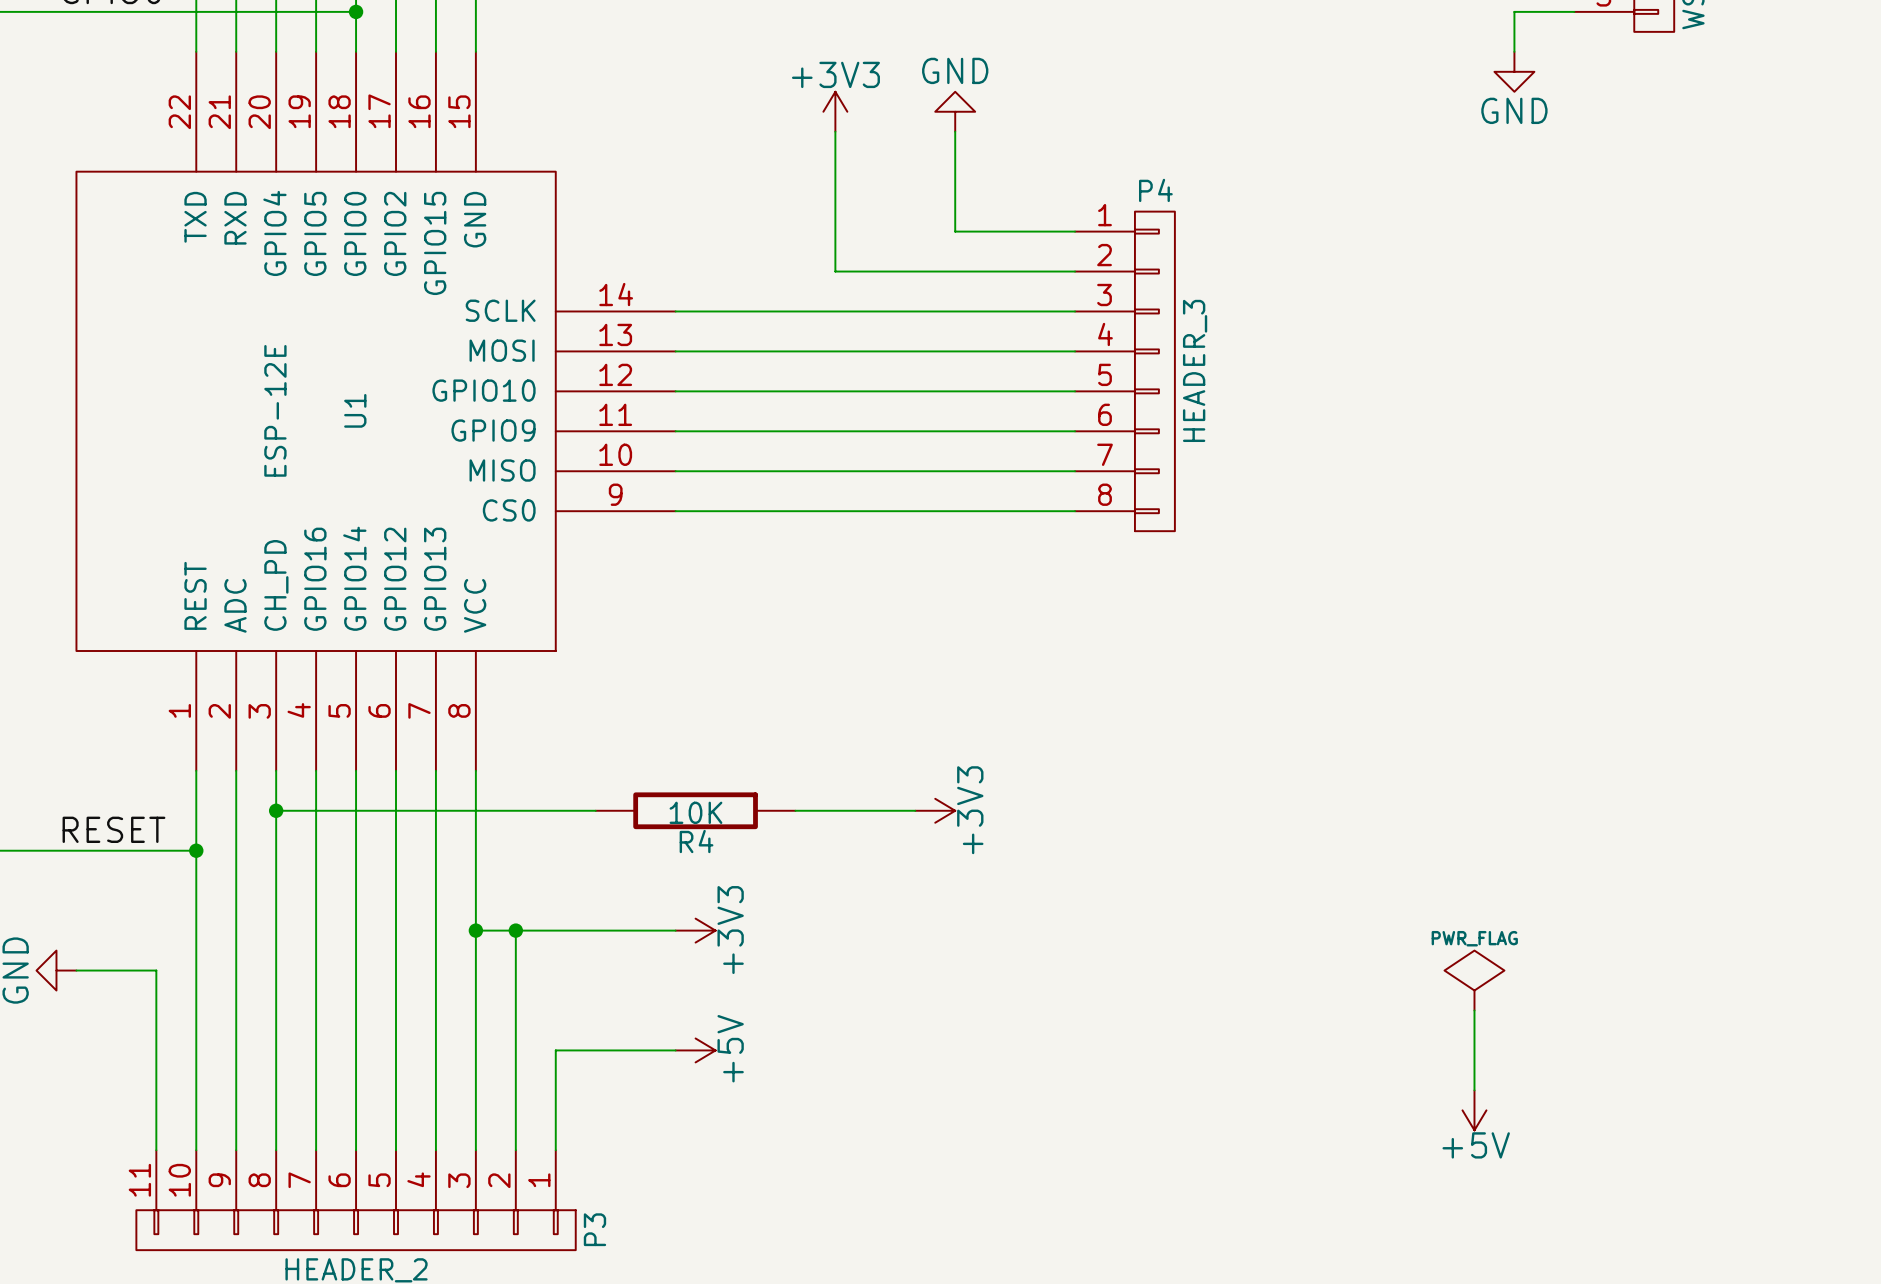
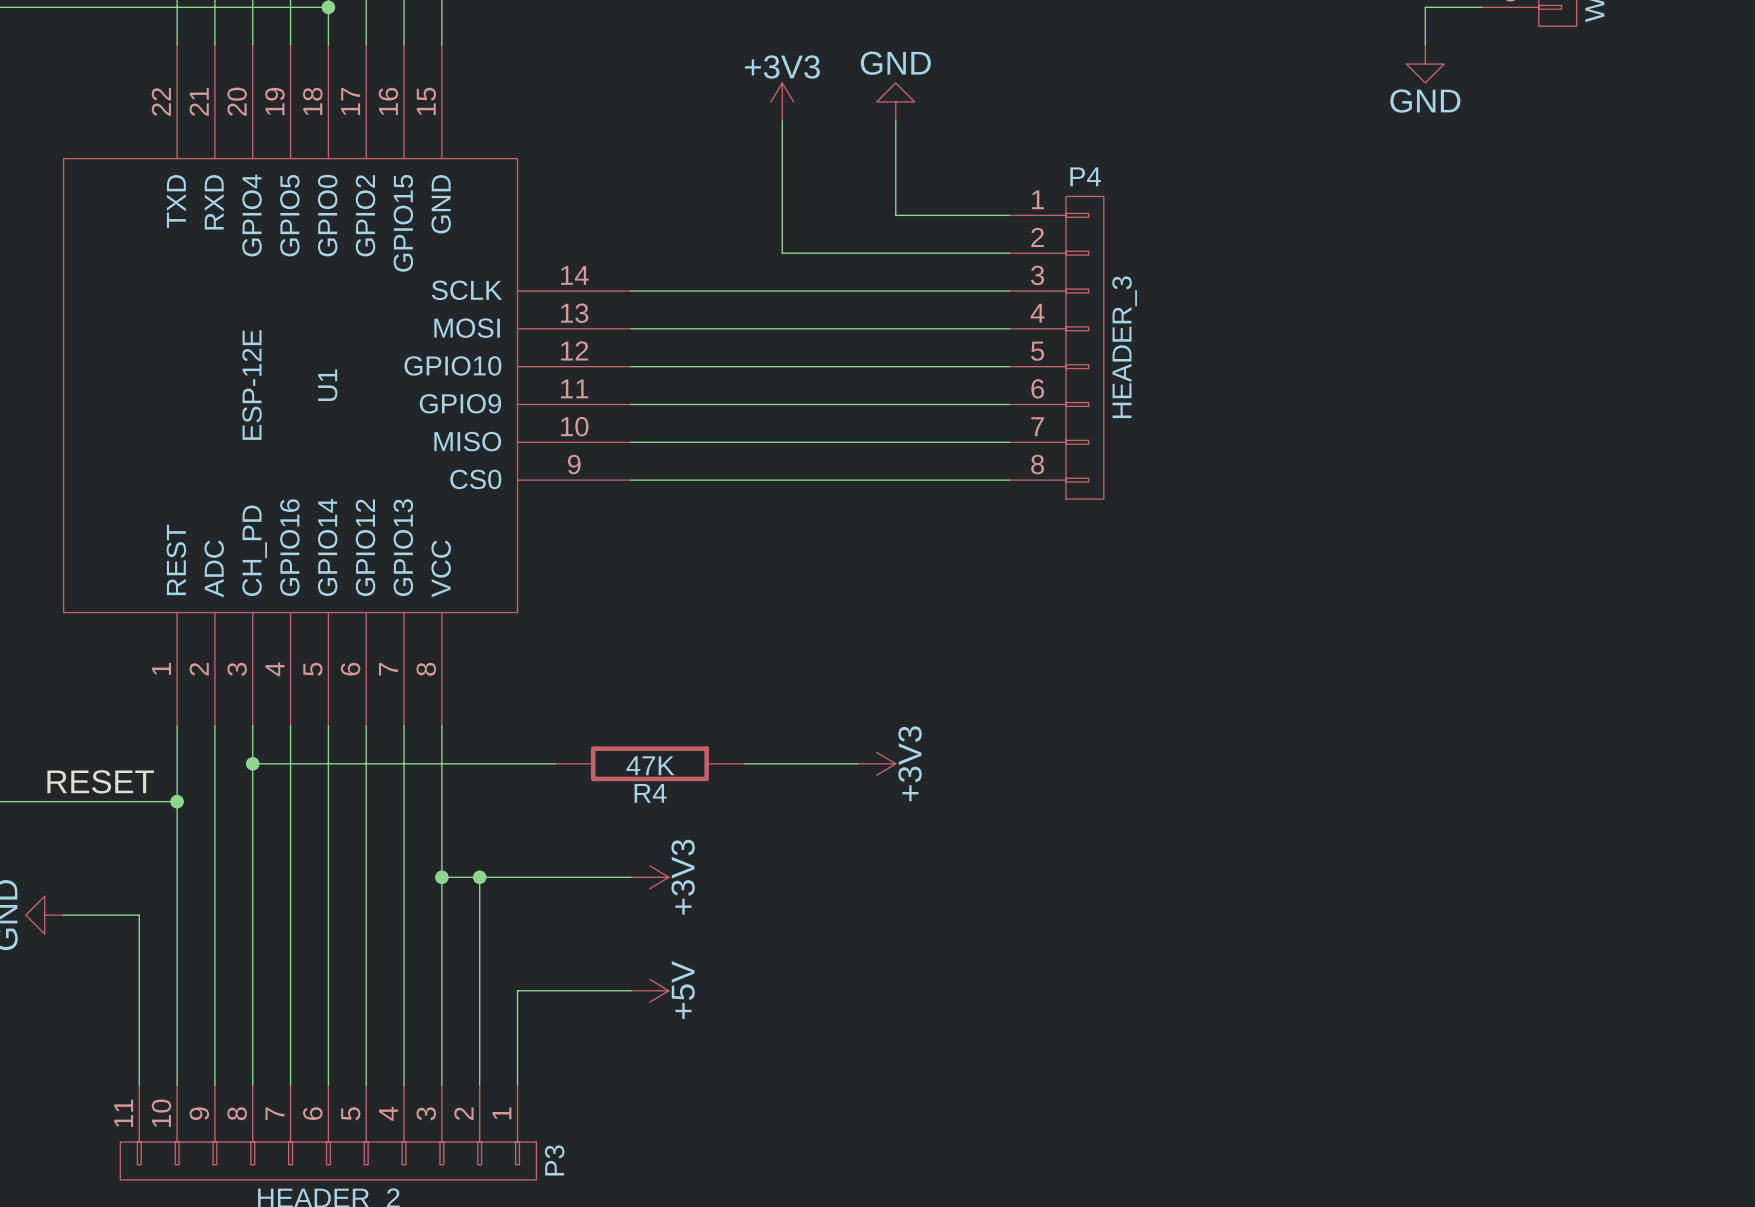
R4 value: 10K (695, 812) -> 47K (650, 765)
power symbol: PWR_FLAG (1474, 980) -> none
wire: (1474, 1010) (1474, 1090) -> none
power symbol: +5V (1474, 1110) -> none

